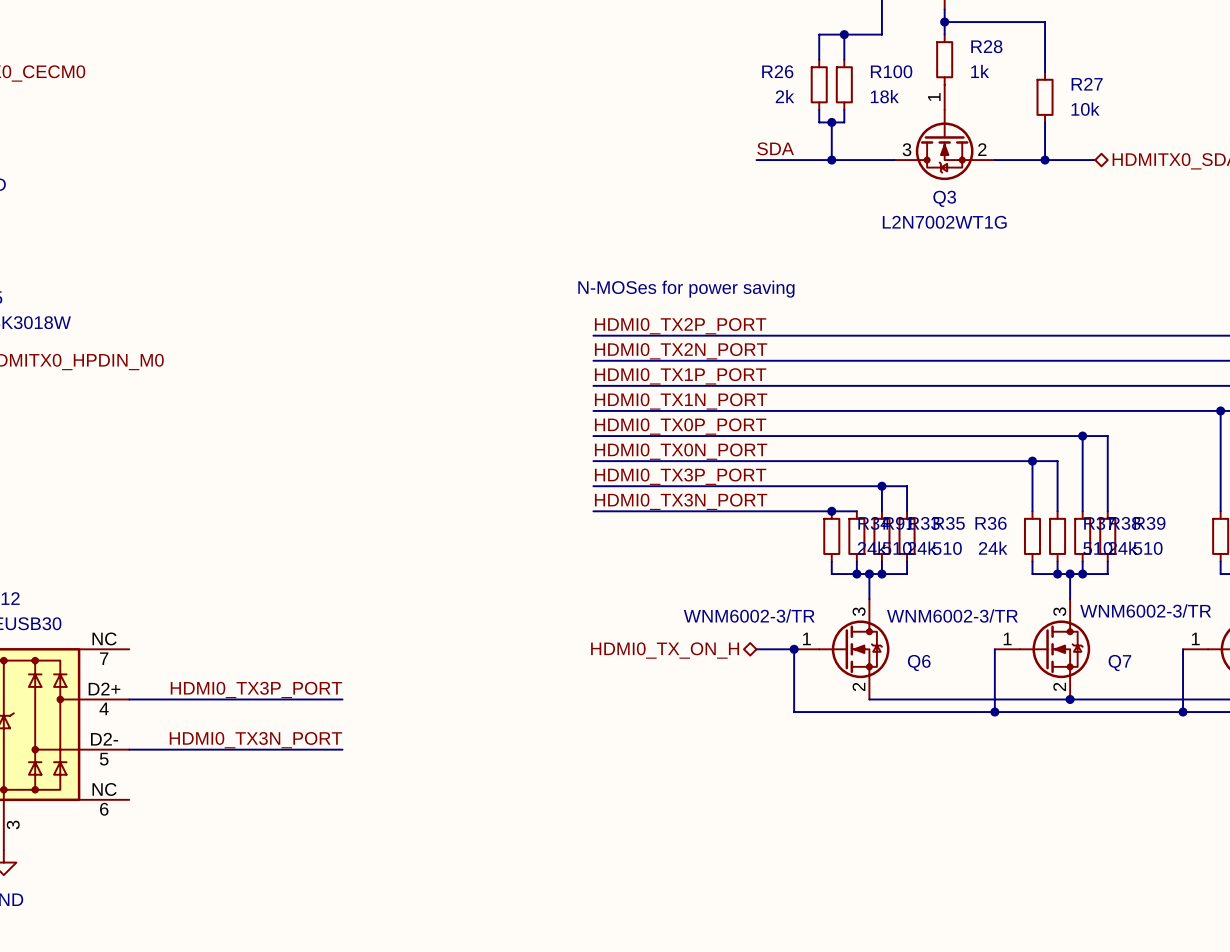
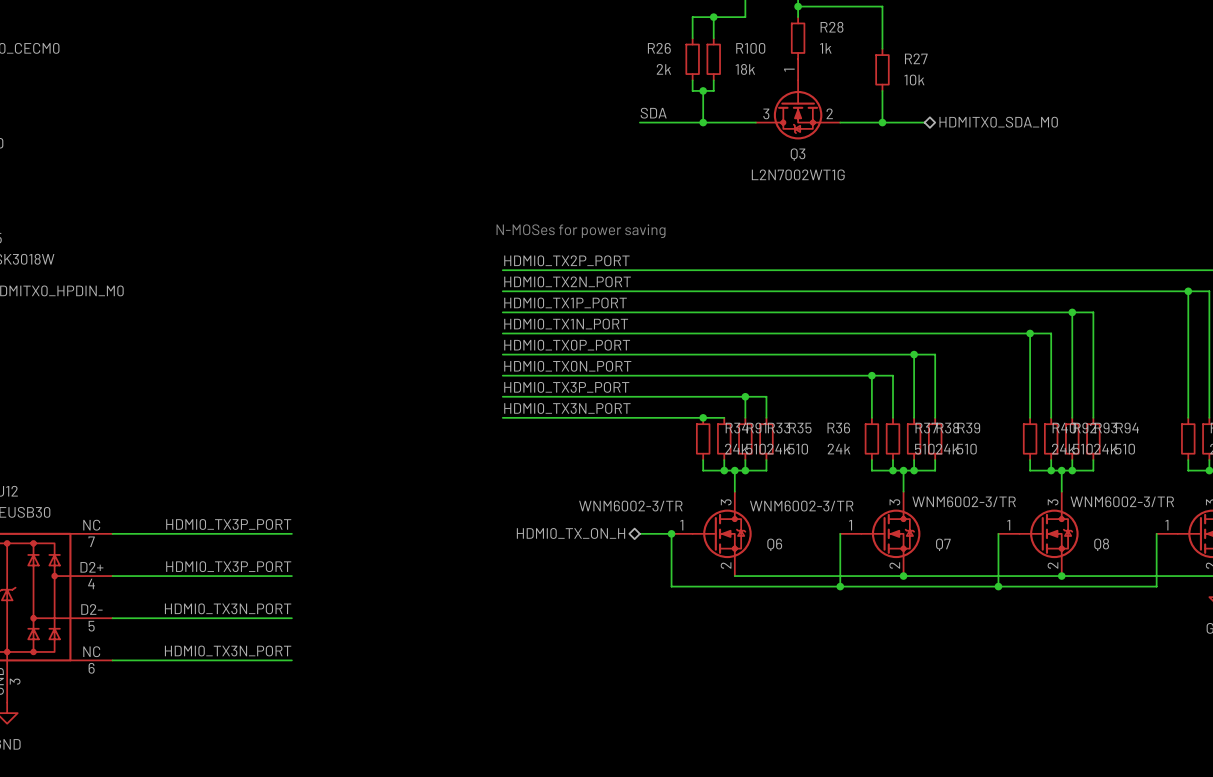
label: none -> HDMI0_TX3P_PORT (228, 524)
wire: none -> (112, 533) (291, 533)
label: none -> HDMI0_TX3N_PORT (228, 651)
wire: none -> (112, 660) (291, 660)

